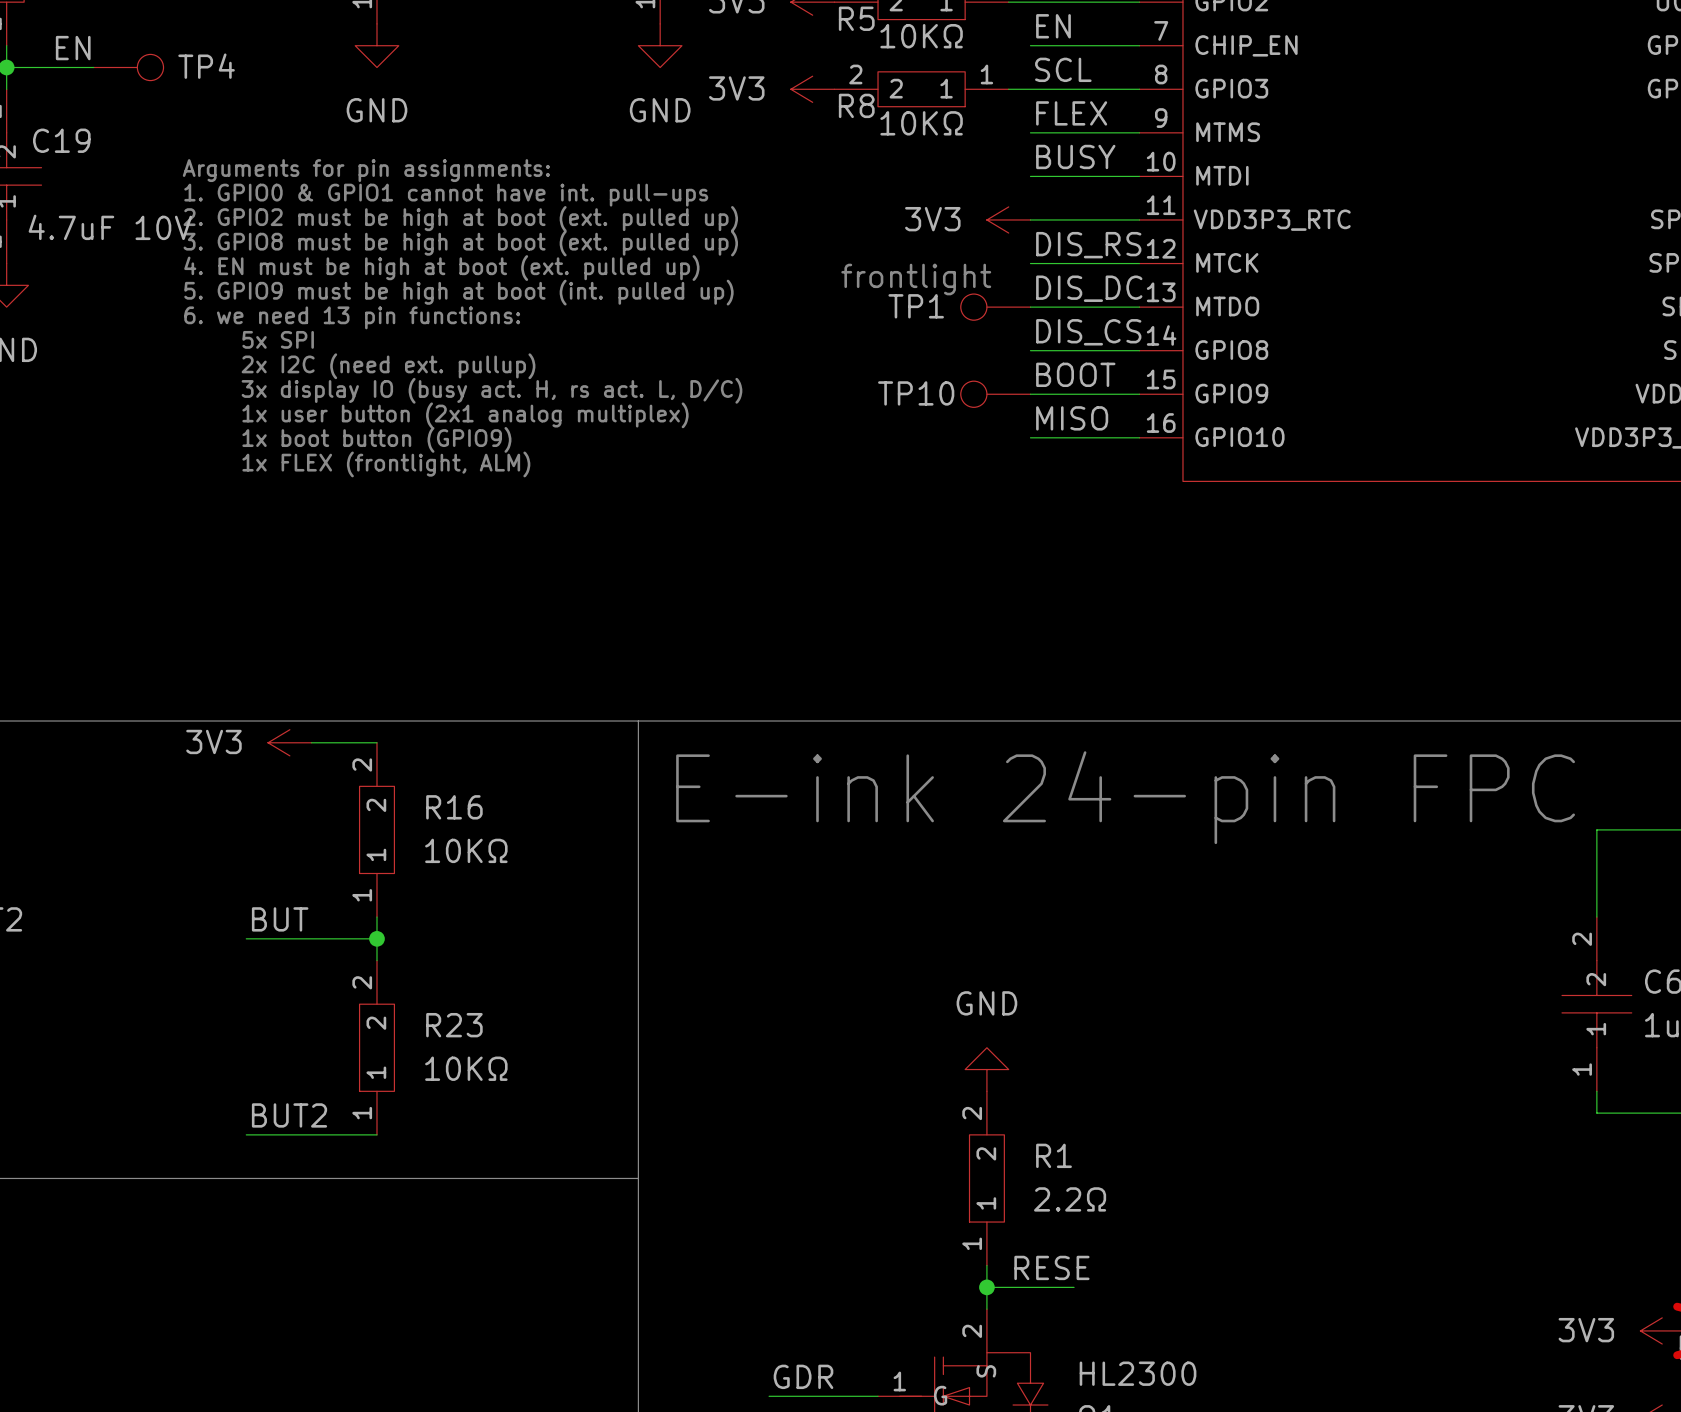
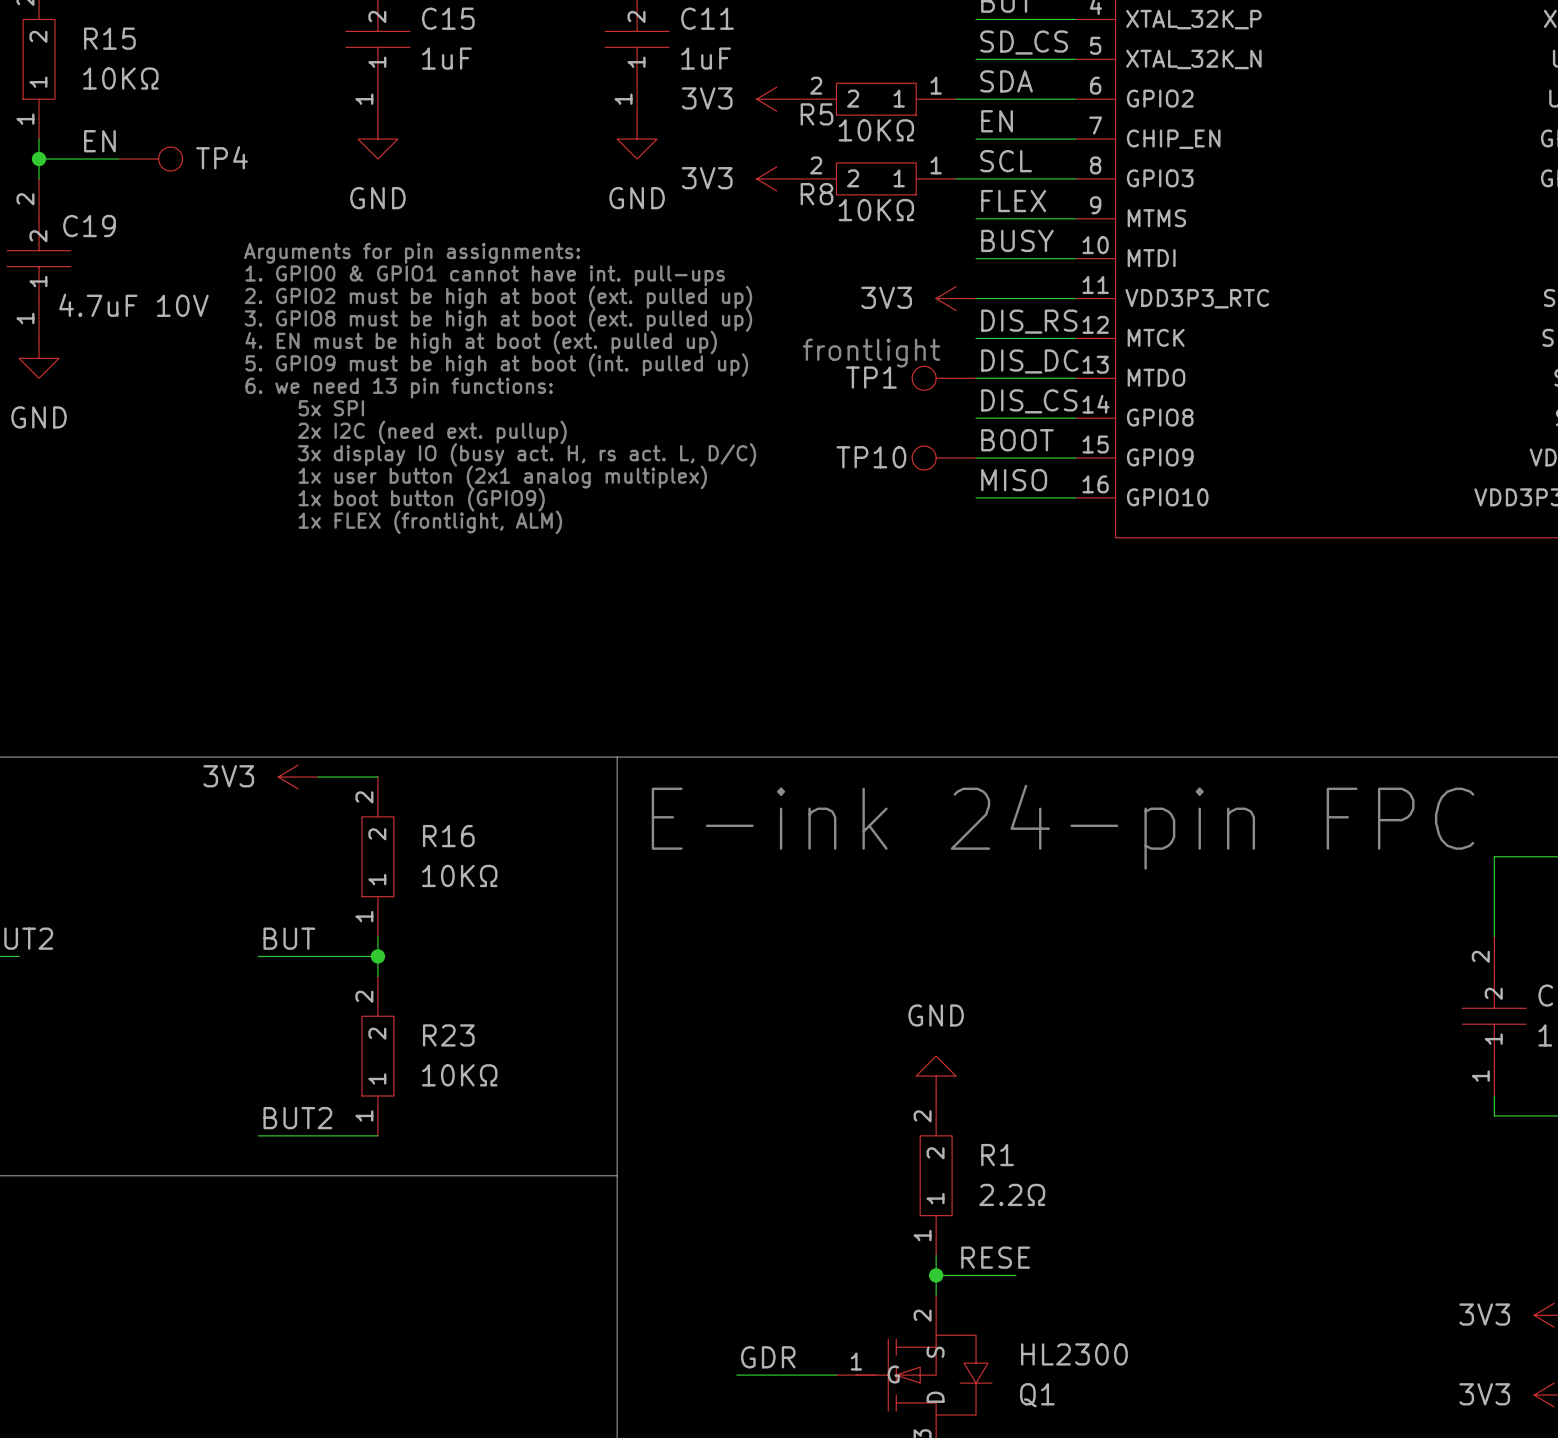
text position: Arguments for pin assignments: (366, 170) -> Arguments for pin assignments: (412, 253)
text position: 1. GPIO0 & GPIO1 cannot have int. pull-ups (446, 195) -> 1. GPIO0 & GPIO1 cannot have int. pull-ups (485, 275)
text position: 2. GPIO2 must be high at boot (ext. pulled up) (460, 218) -> 2. GPIO2 must be high at boot (ext. pulled up) (498, 297)
text position: 3. GPIO8 must be high at boot (ext. pulled up) (460, 243) -> 3. GPIO8 must be high at boot (ext. pulled up) (498, 320)
text position: 4. EN must be high at boot (ext. pulled up) (441, 268) -> 4. EN must be high at boot (ext. pulled up) (481, 342)
text position: 5. GPIO9 must be high at boot (int. pulled up) (458, 292) -> 5. GPIO9 must be high at boot (int. pulled up) (496, 365)
text position: 6. we need 13 pin functions: (352, 317) -> 6. we need 13 pin functions: (399, 388)
text position: 5x SPI (278, 339) -> 5x SPI (331, 408)
text position: 2x I2C (need ext. pullup) (388, 366) -> 2x I2C (need ext. pullup) (432, 432)
text position: 3x display IO (busy act. H, rs act. L, D/C) (491, 390) -> 3x display IO (busy act. H, rs act. L, D/C) (527, 454)
text position: 1x user button (2x1 analog multiplex) (465, 415) -> 1x user button (2x1 analog multiplex) (502, 477)
text position: 1x boot button (GPIO9) (376, 439) -> 1x boot button (GPIO9) (421, 499)
text position: 1x FLEX (frontlight, ALM) (386, 464) -> 1x FLEX (frontlight, ALM) (430, 522)

